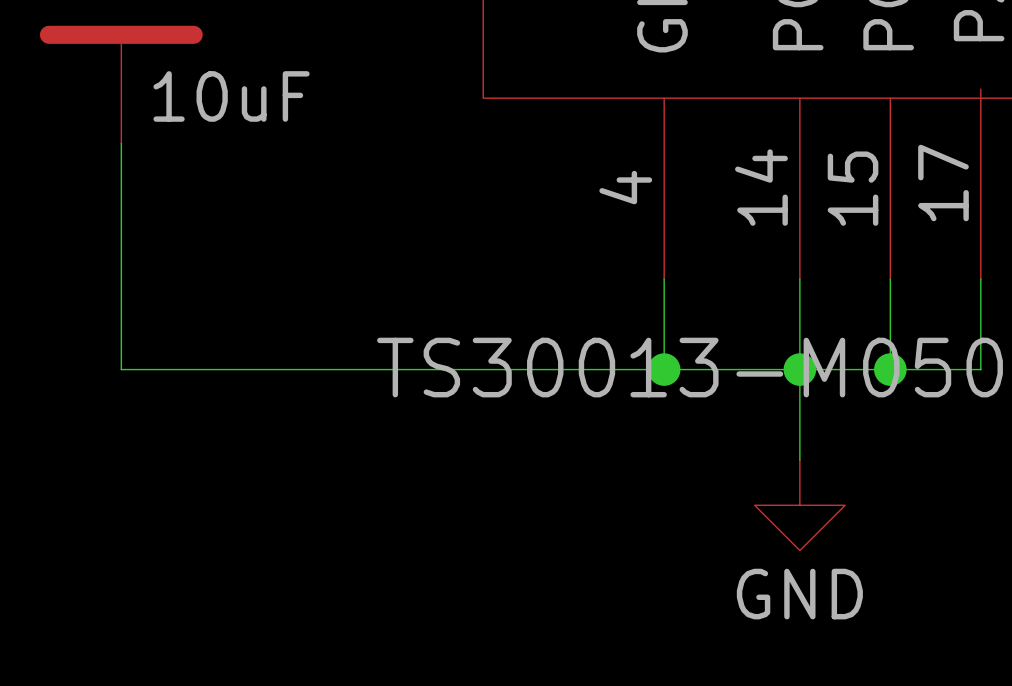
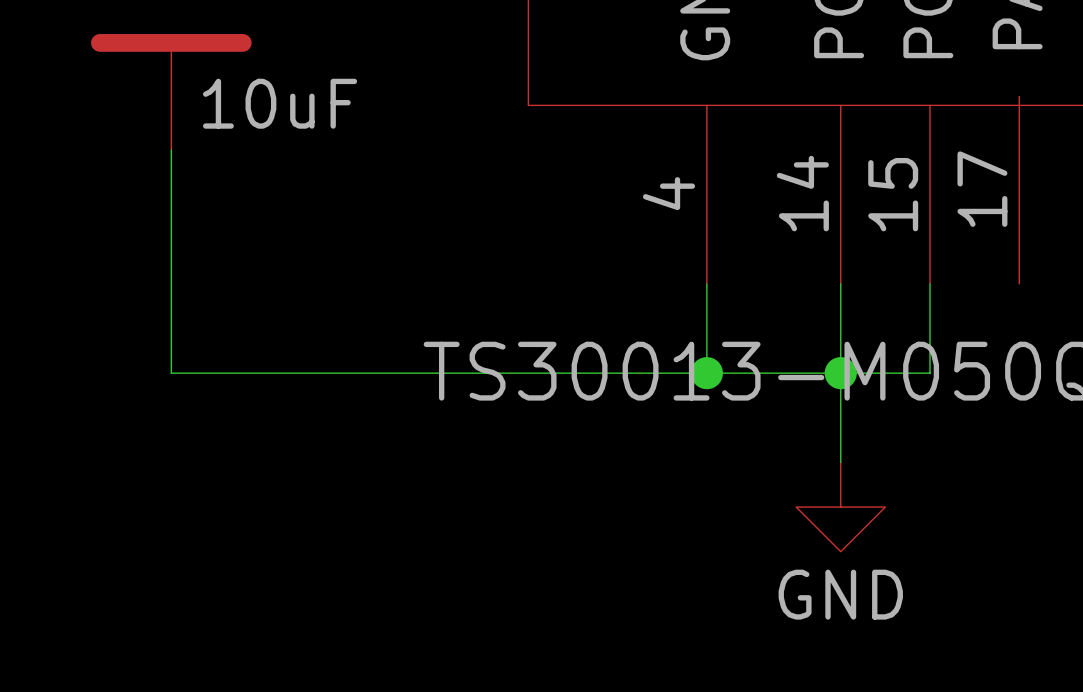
wire: (980, 279) (980, 369) (890, 369) -> none
junction: (890, 369) -> none

